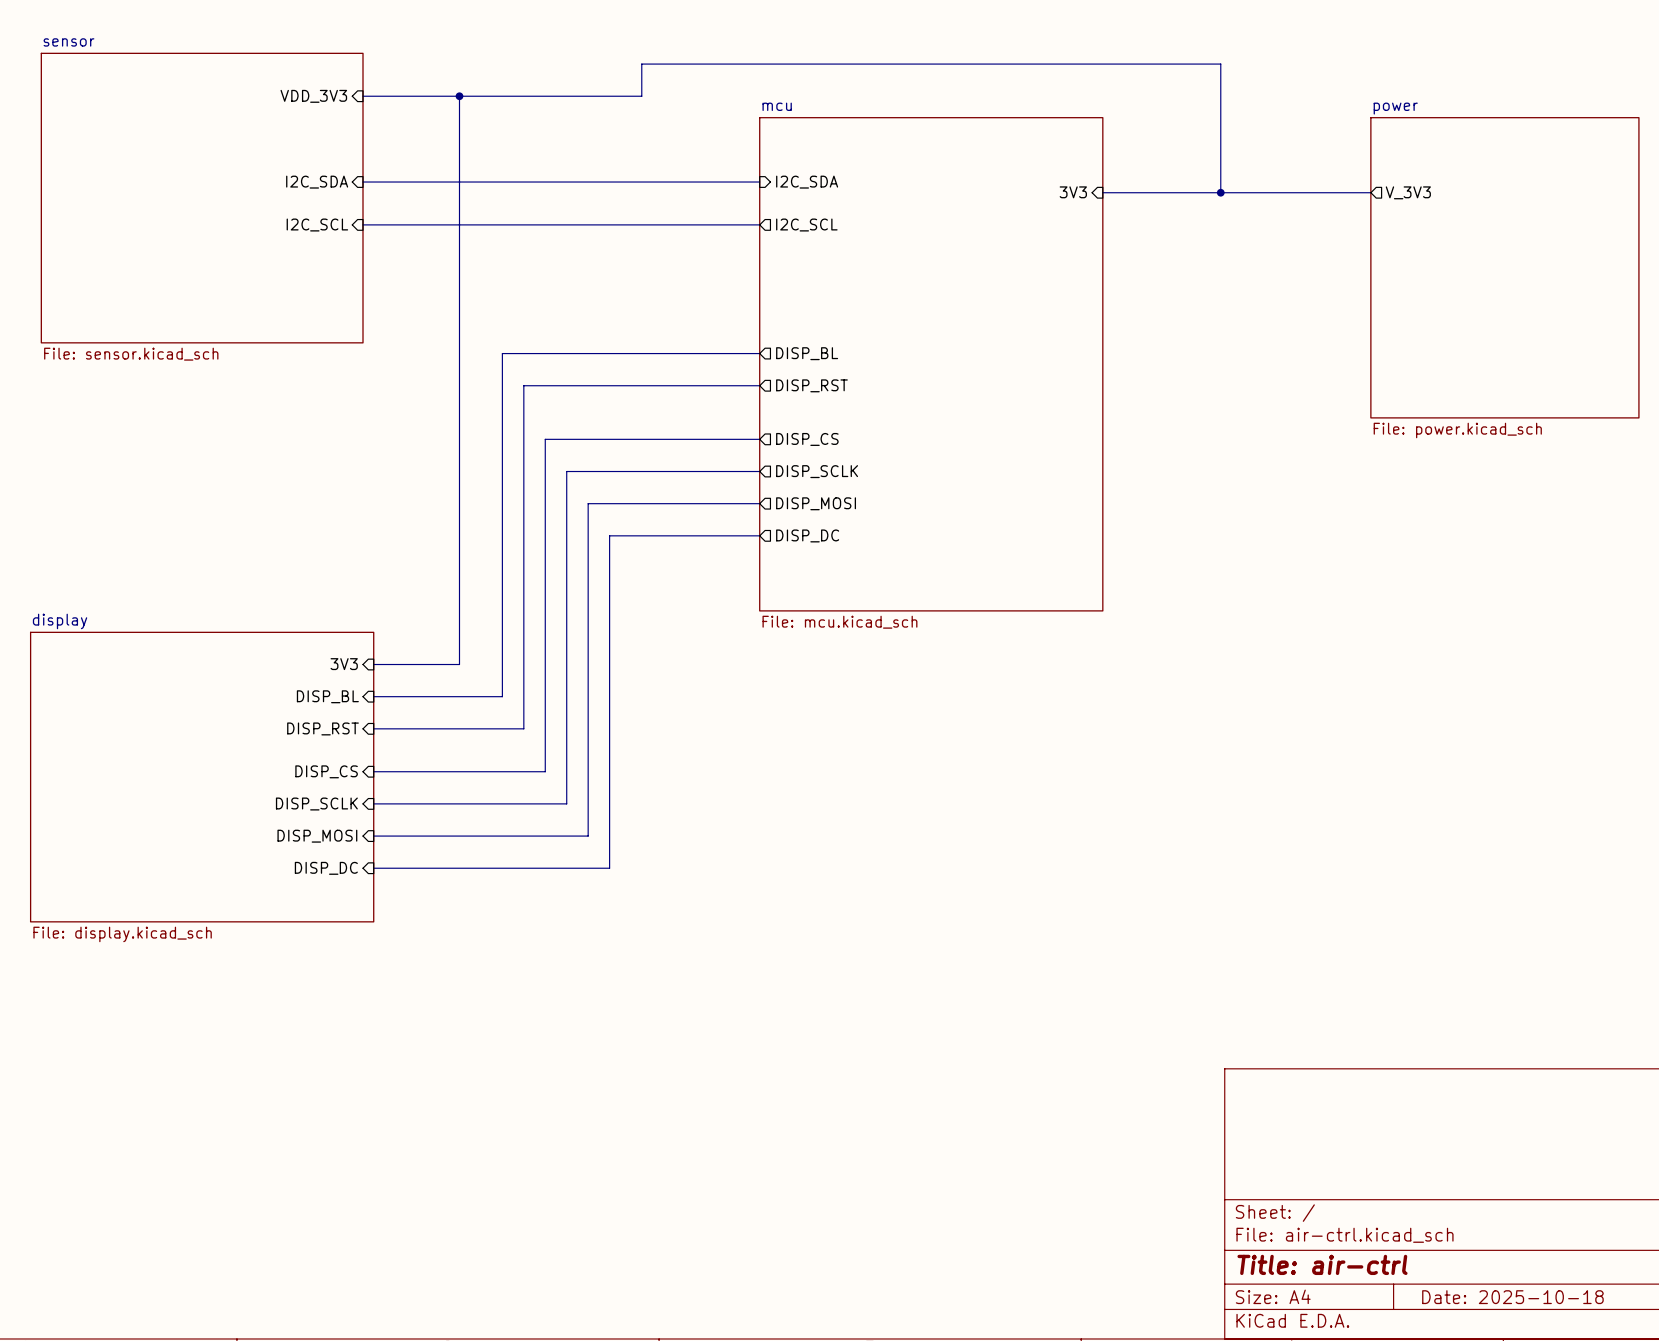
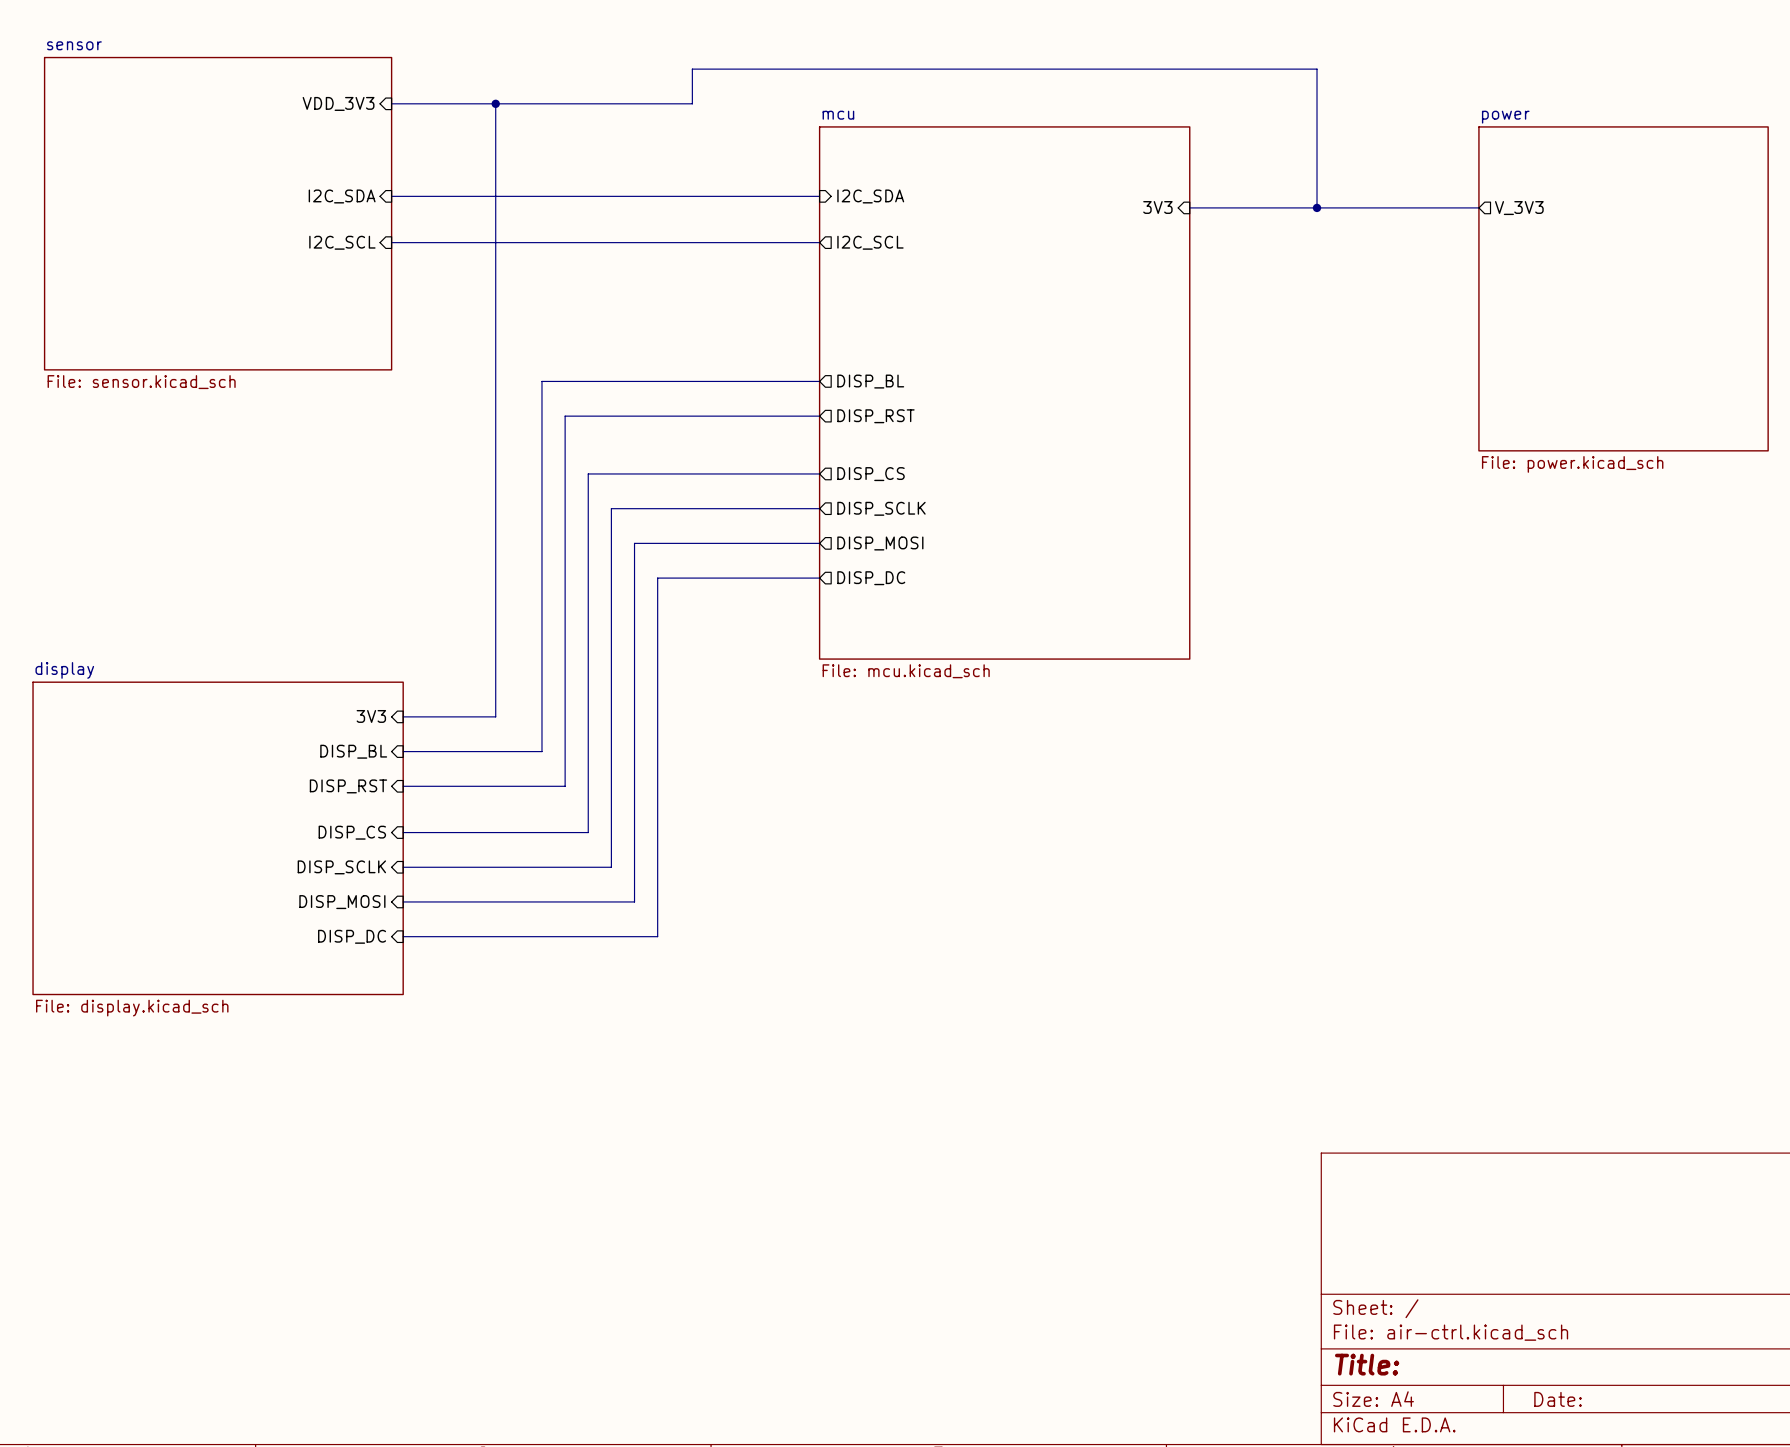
title block: Title: air-ctrl (1322, 1264) -> Title: (1367, 1364)
title block: Date: 2025-10-18 (1512, 1297) -> Date: (1558, 1399)

